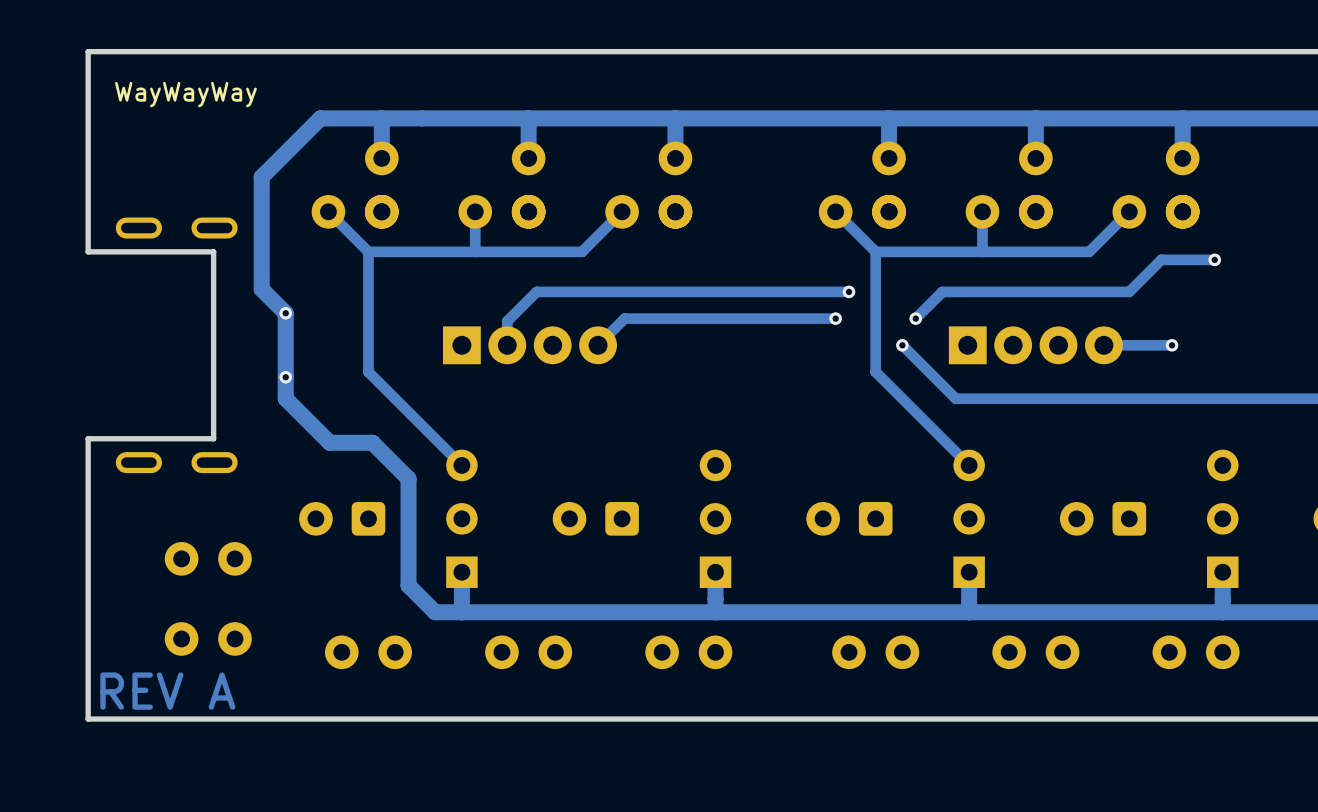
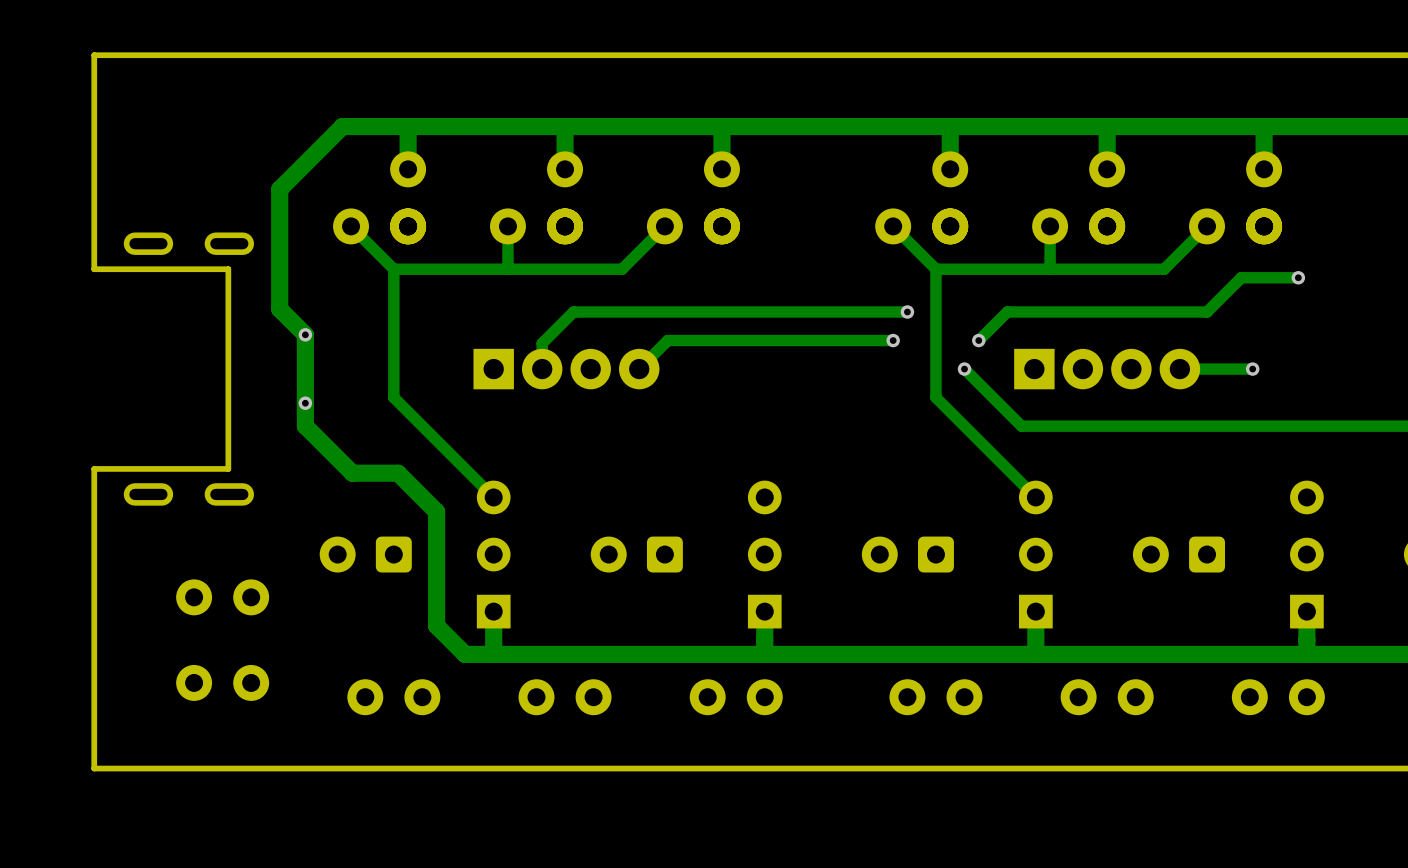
text: WayWayWay (185, 94) -> none
text: REV A (167, 691) -> none

